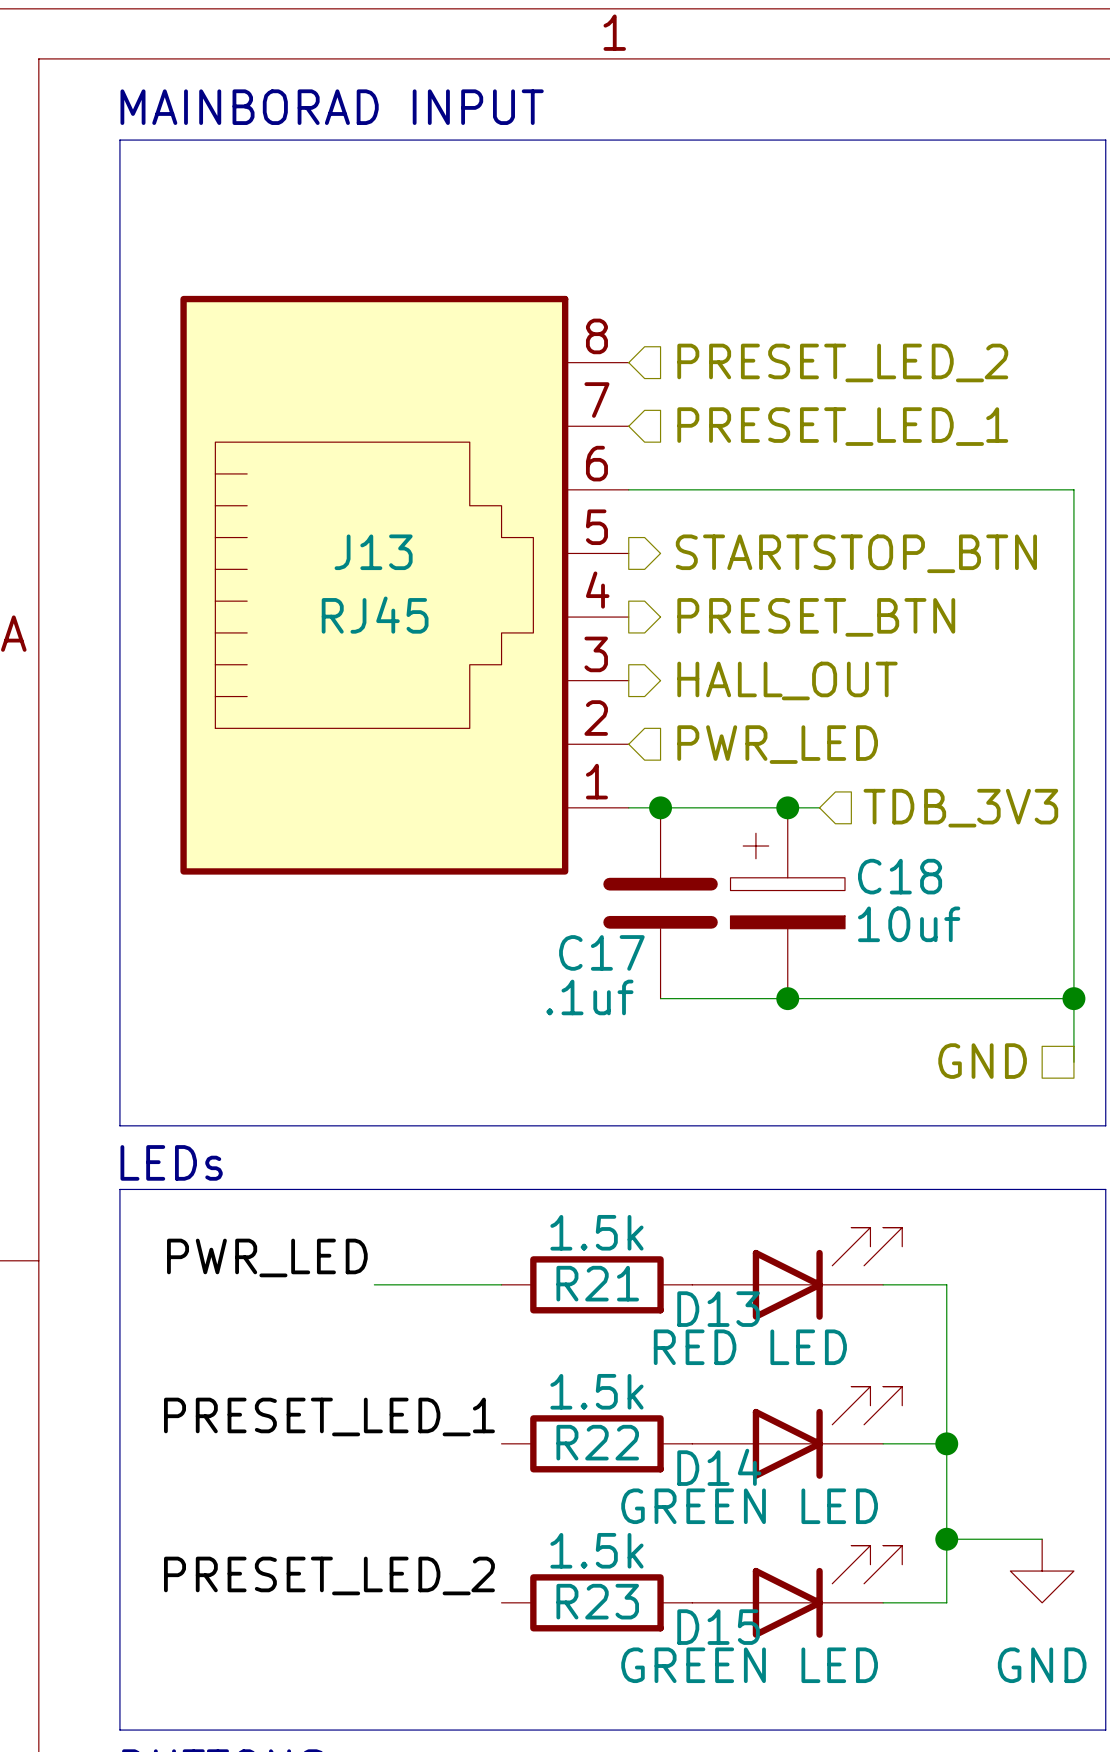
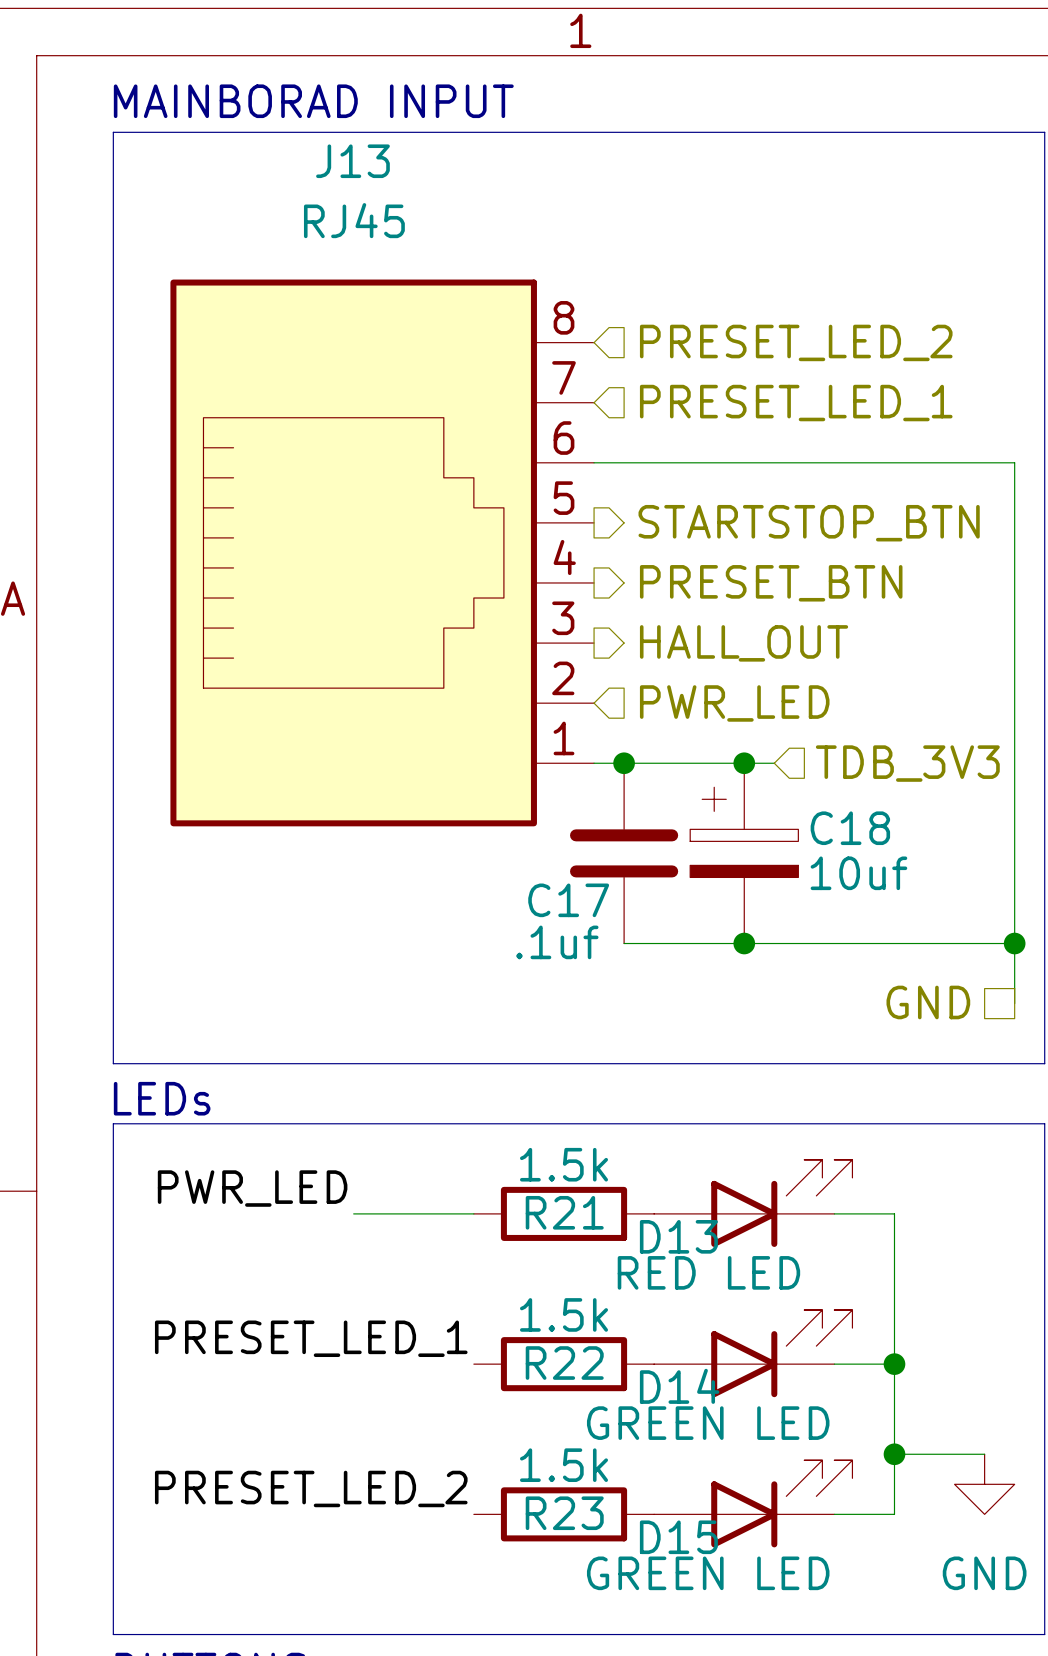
J13 name position: J13 (373, 552) -> J13 (352, 161)
J13 value position: RJ45 (375, 615) -> RJ45 (354, 220)

